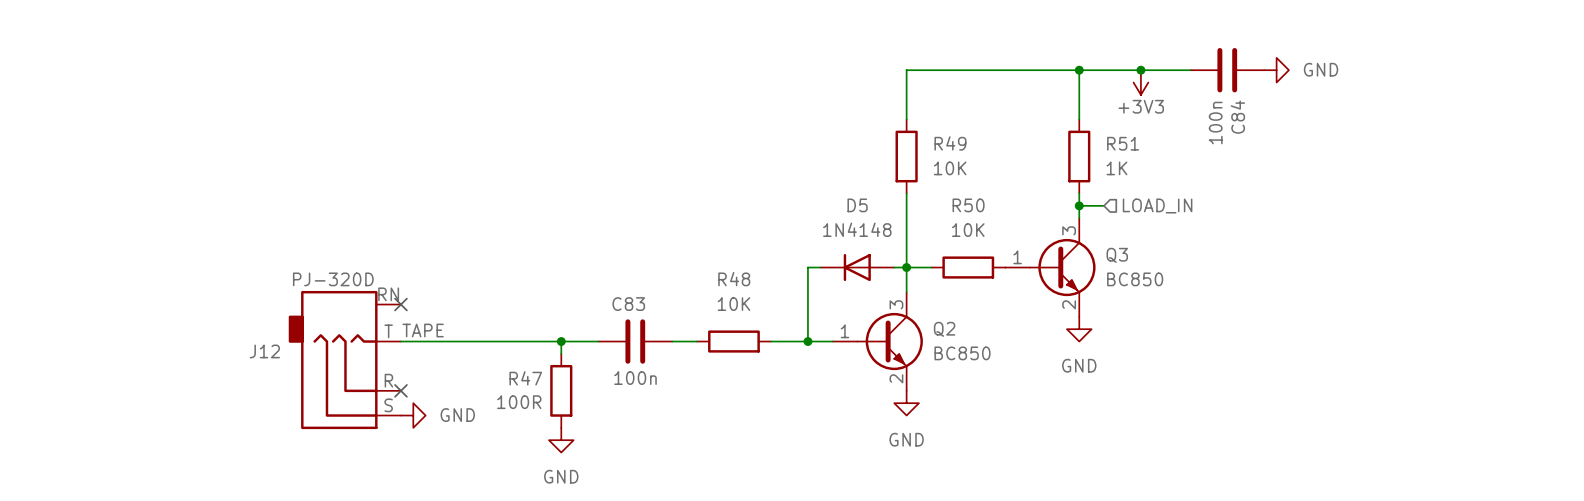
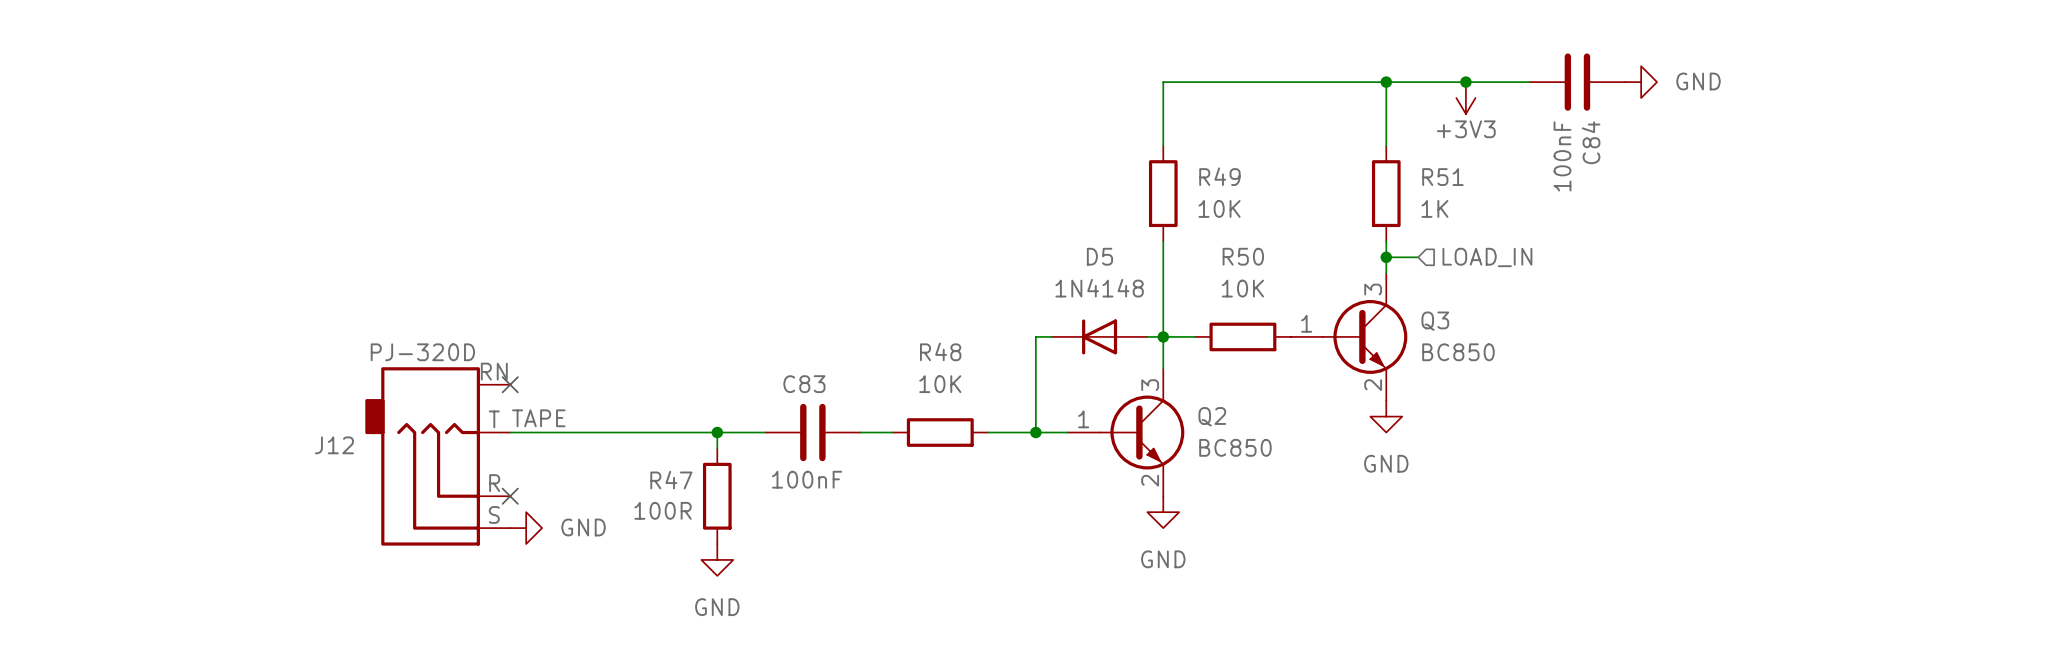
C84 value: 100n (1215, 123) -> 100nF (1562, 156)
C83 value: 100n (635, 378) -> 100nF (807, 479)

